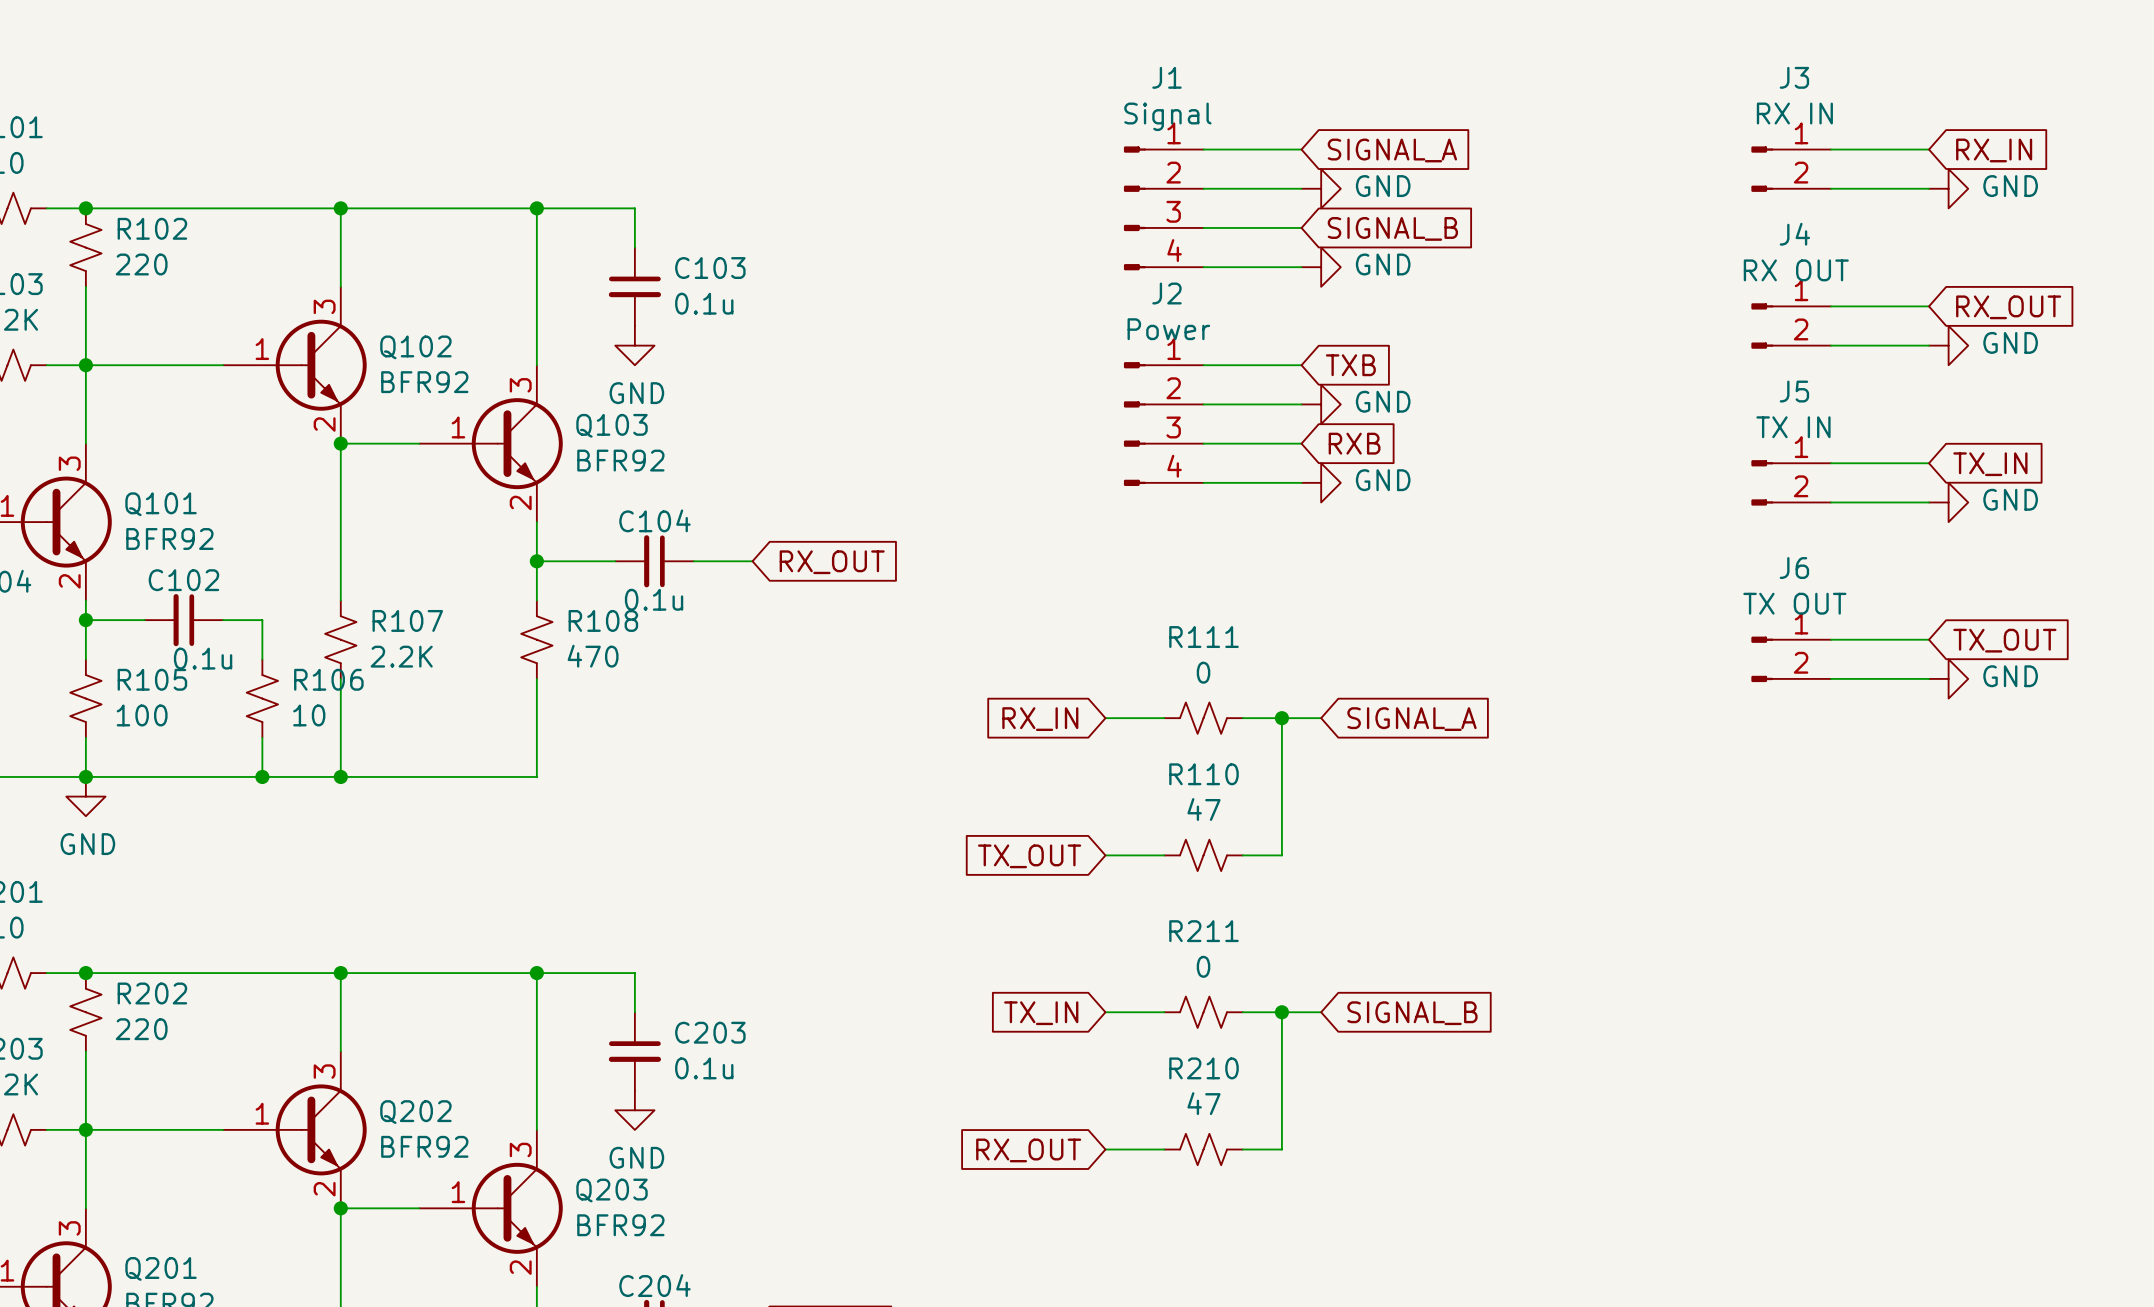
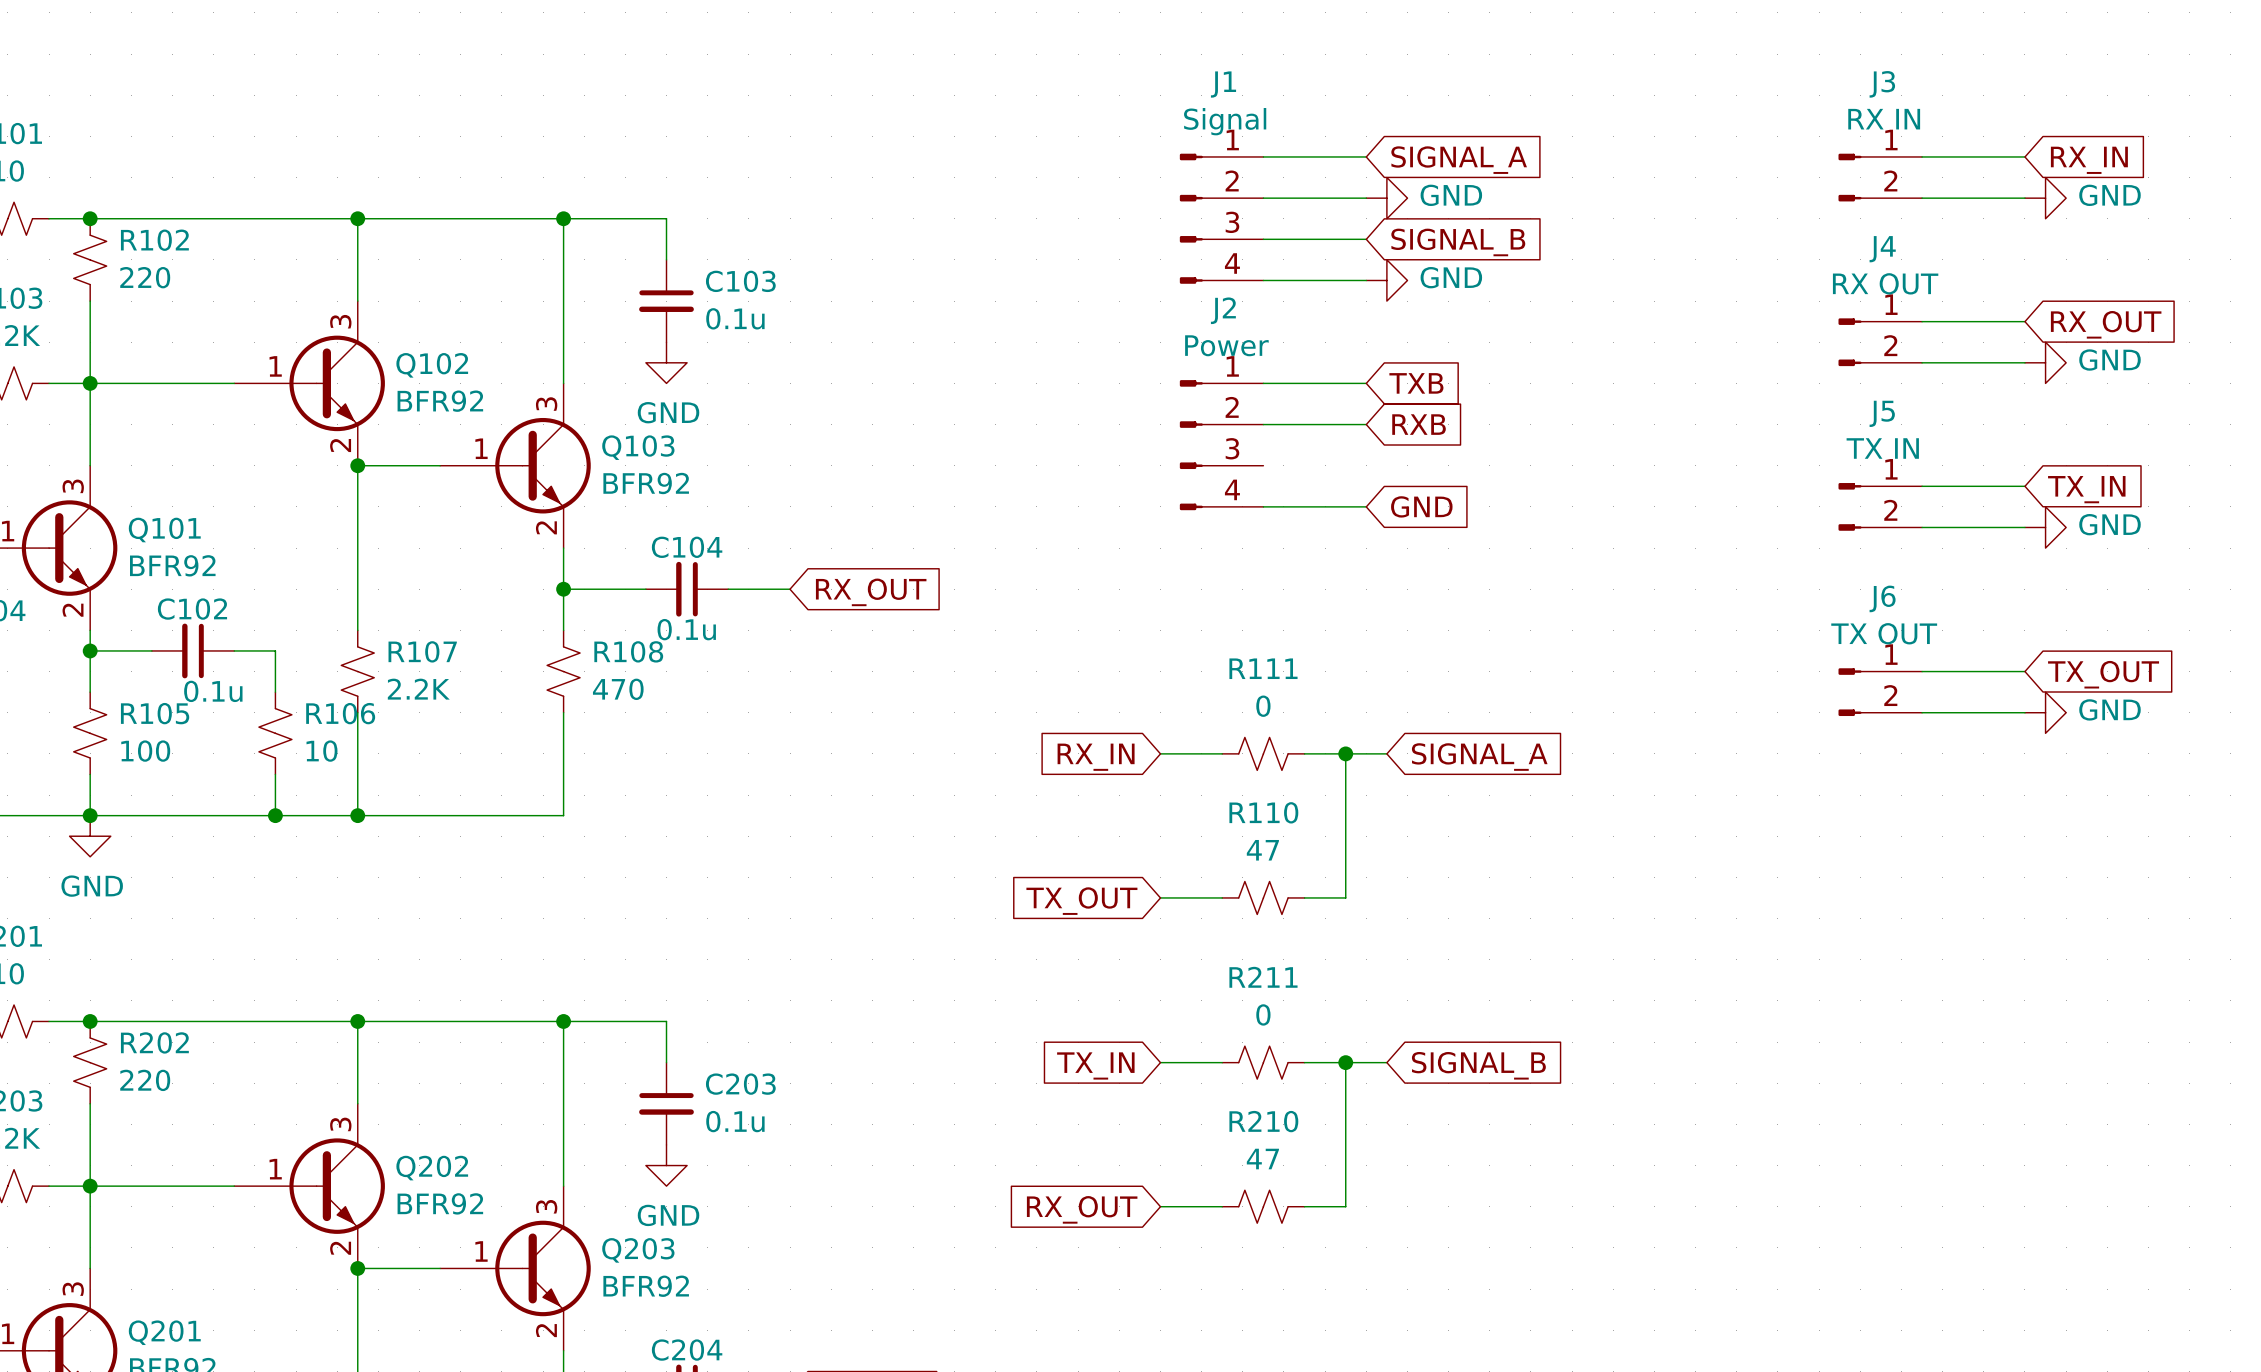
power symbol: GND (1321, 404) -> none
wire: (1203, 443) (1301, 443) -> none
global label position: RXB (1354, 443) -> RXB (1419, 424)
power symbol: GND (1321, 482) -> none
global label: none -> GND (1421, 506)

